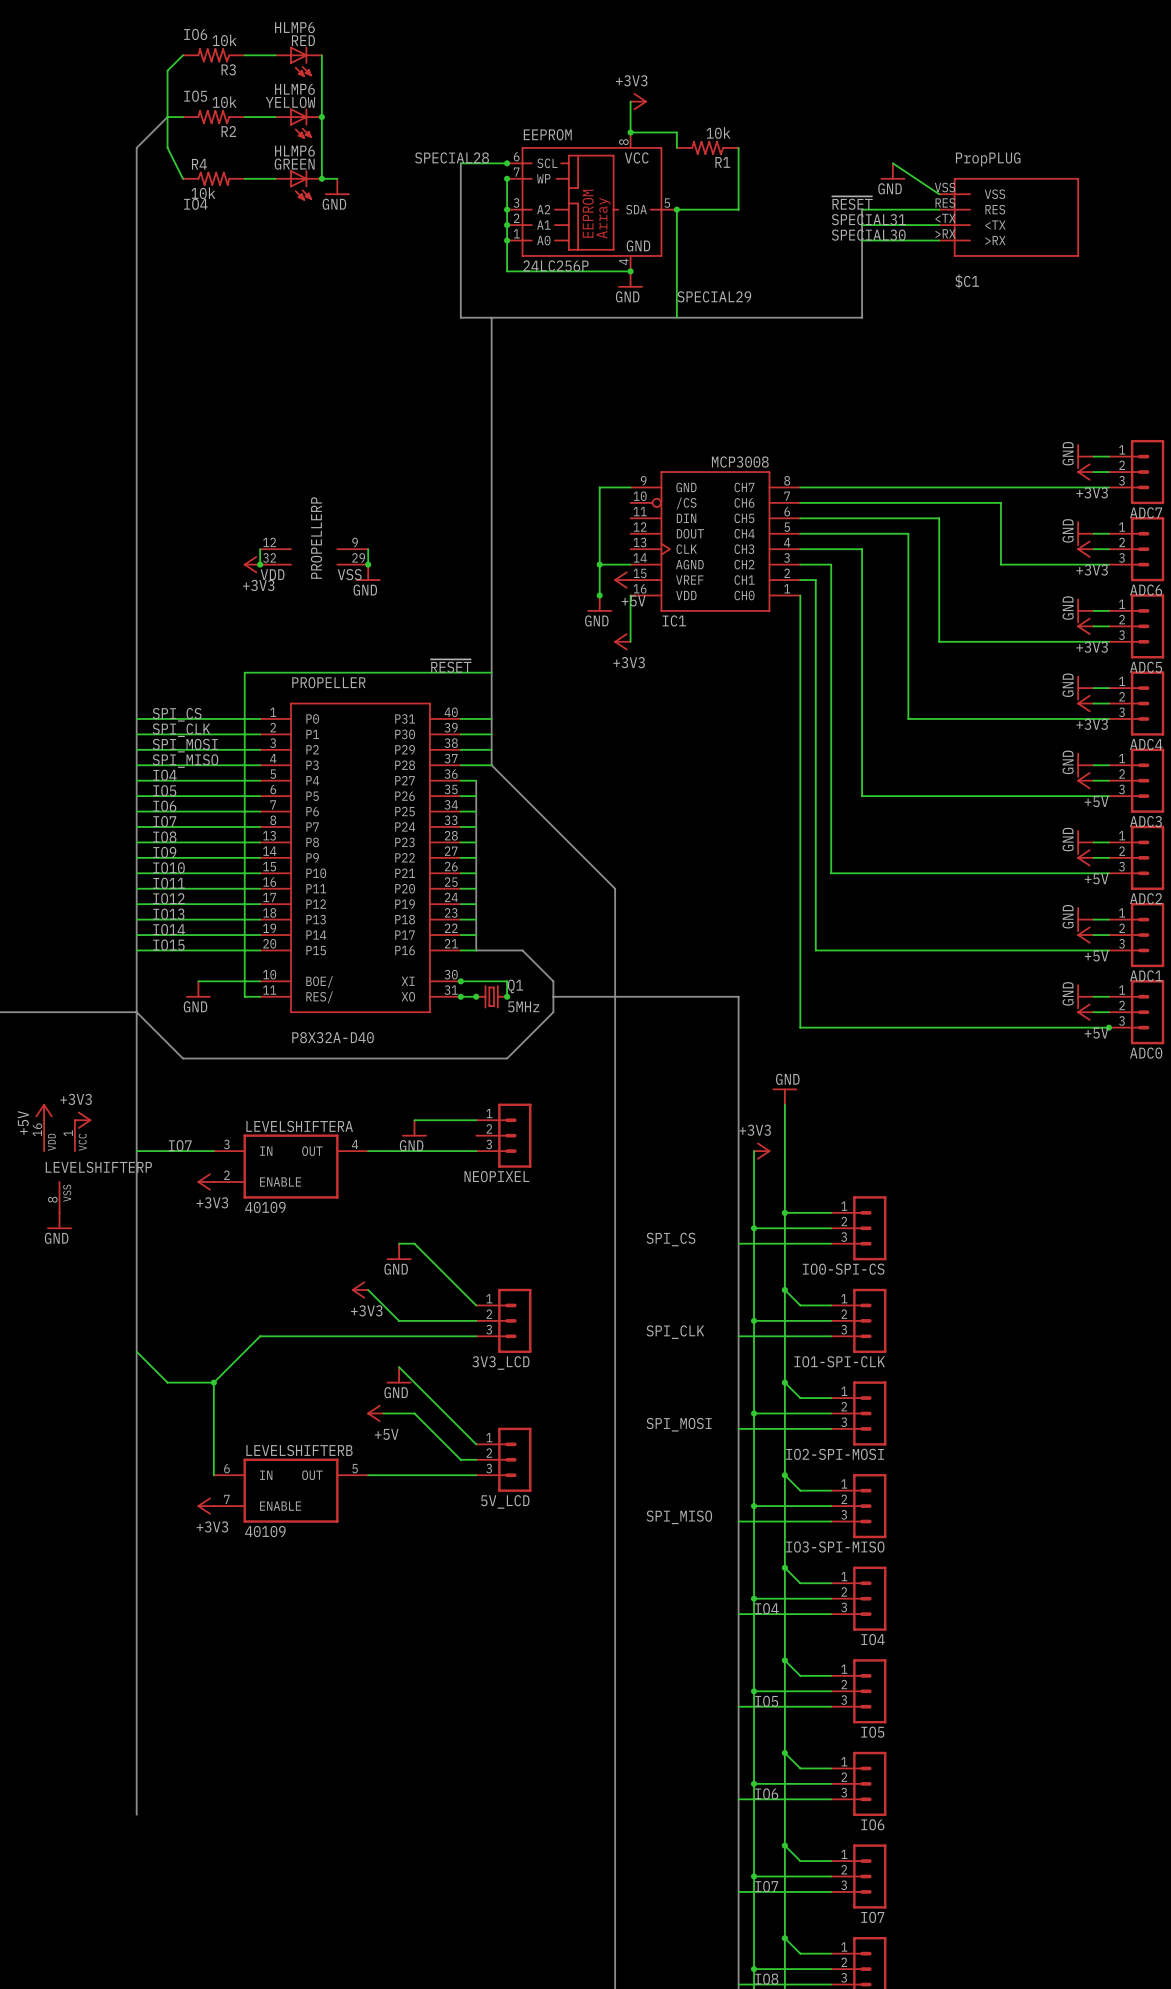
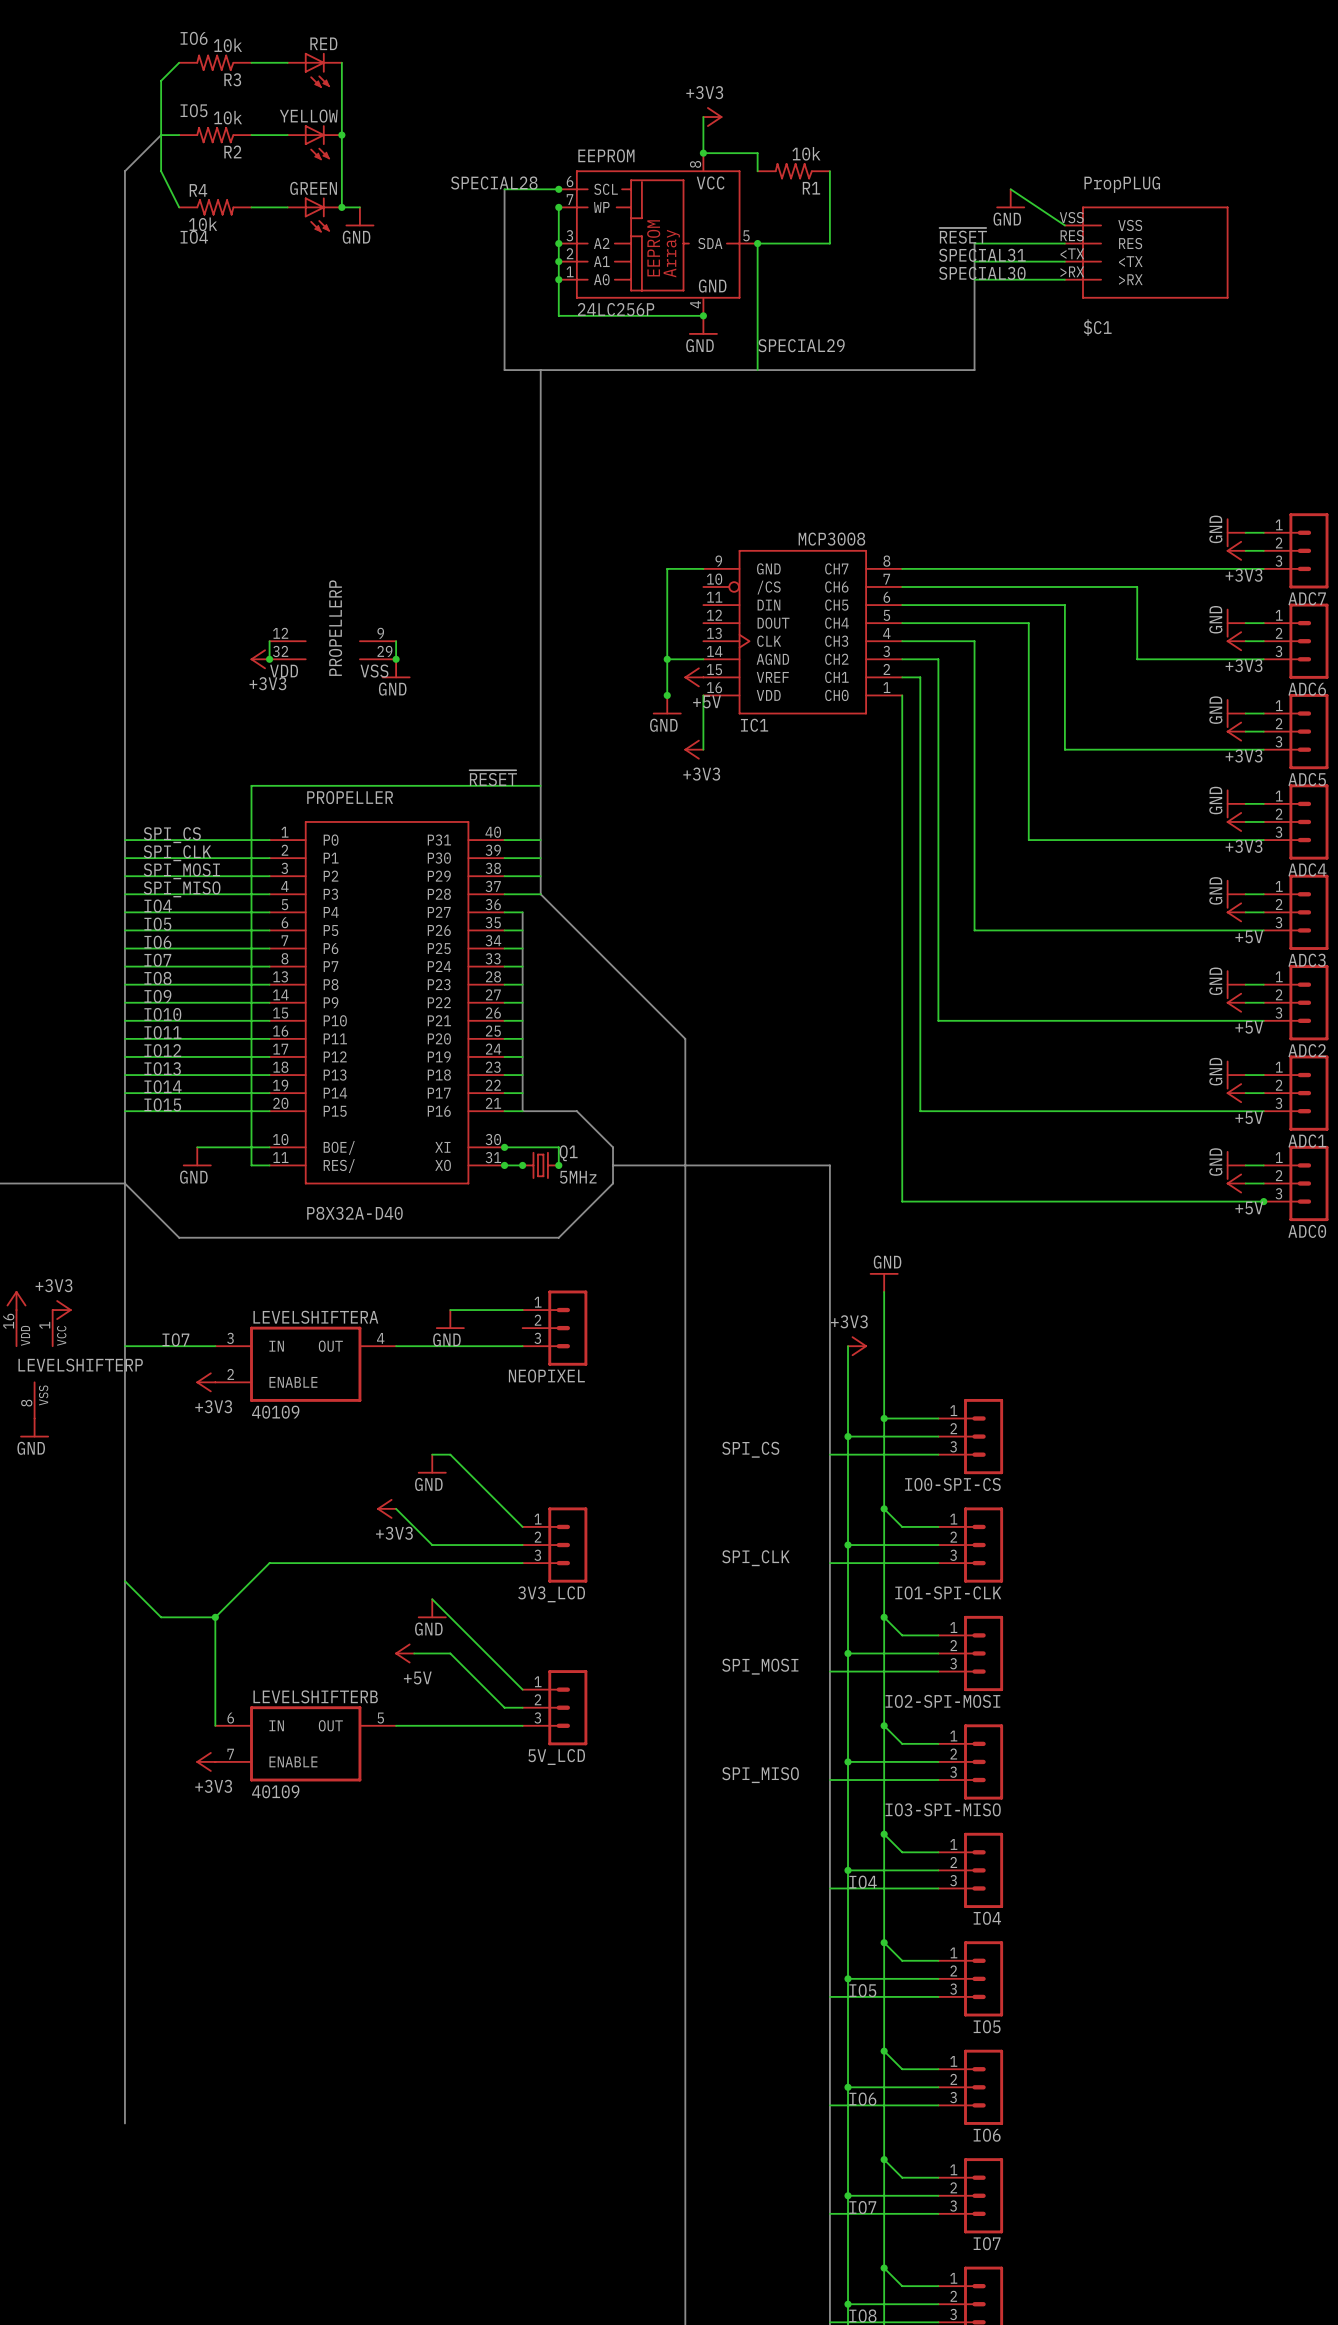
RED value: HLMP6 (294, 27) -> none
RED symbol: [275, 46, 322, 77] -> [287, 52, 342, 88]
YELLOW value: HLMP6 (294, 89) -> none
YELLOW symbol: [275, 108, 322, 139] -> [287, 125, 342, 161]
GREEN value: HLMP6 (294, 151) -> none
GREEN symbol: [275, 170, 322, 201] -> [287, 197, 342, 233]

